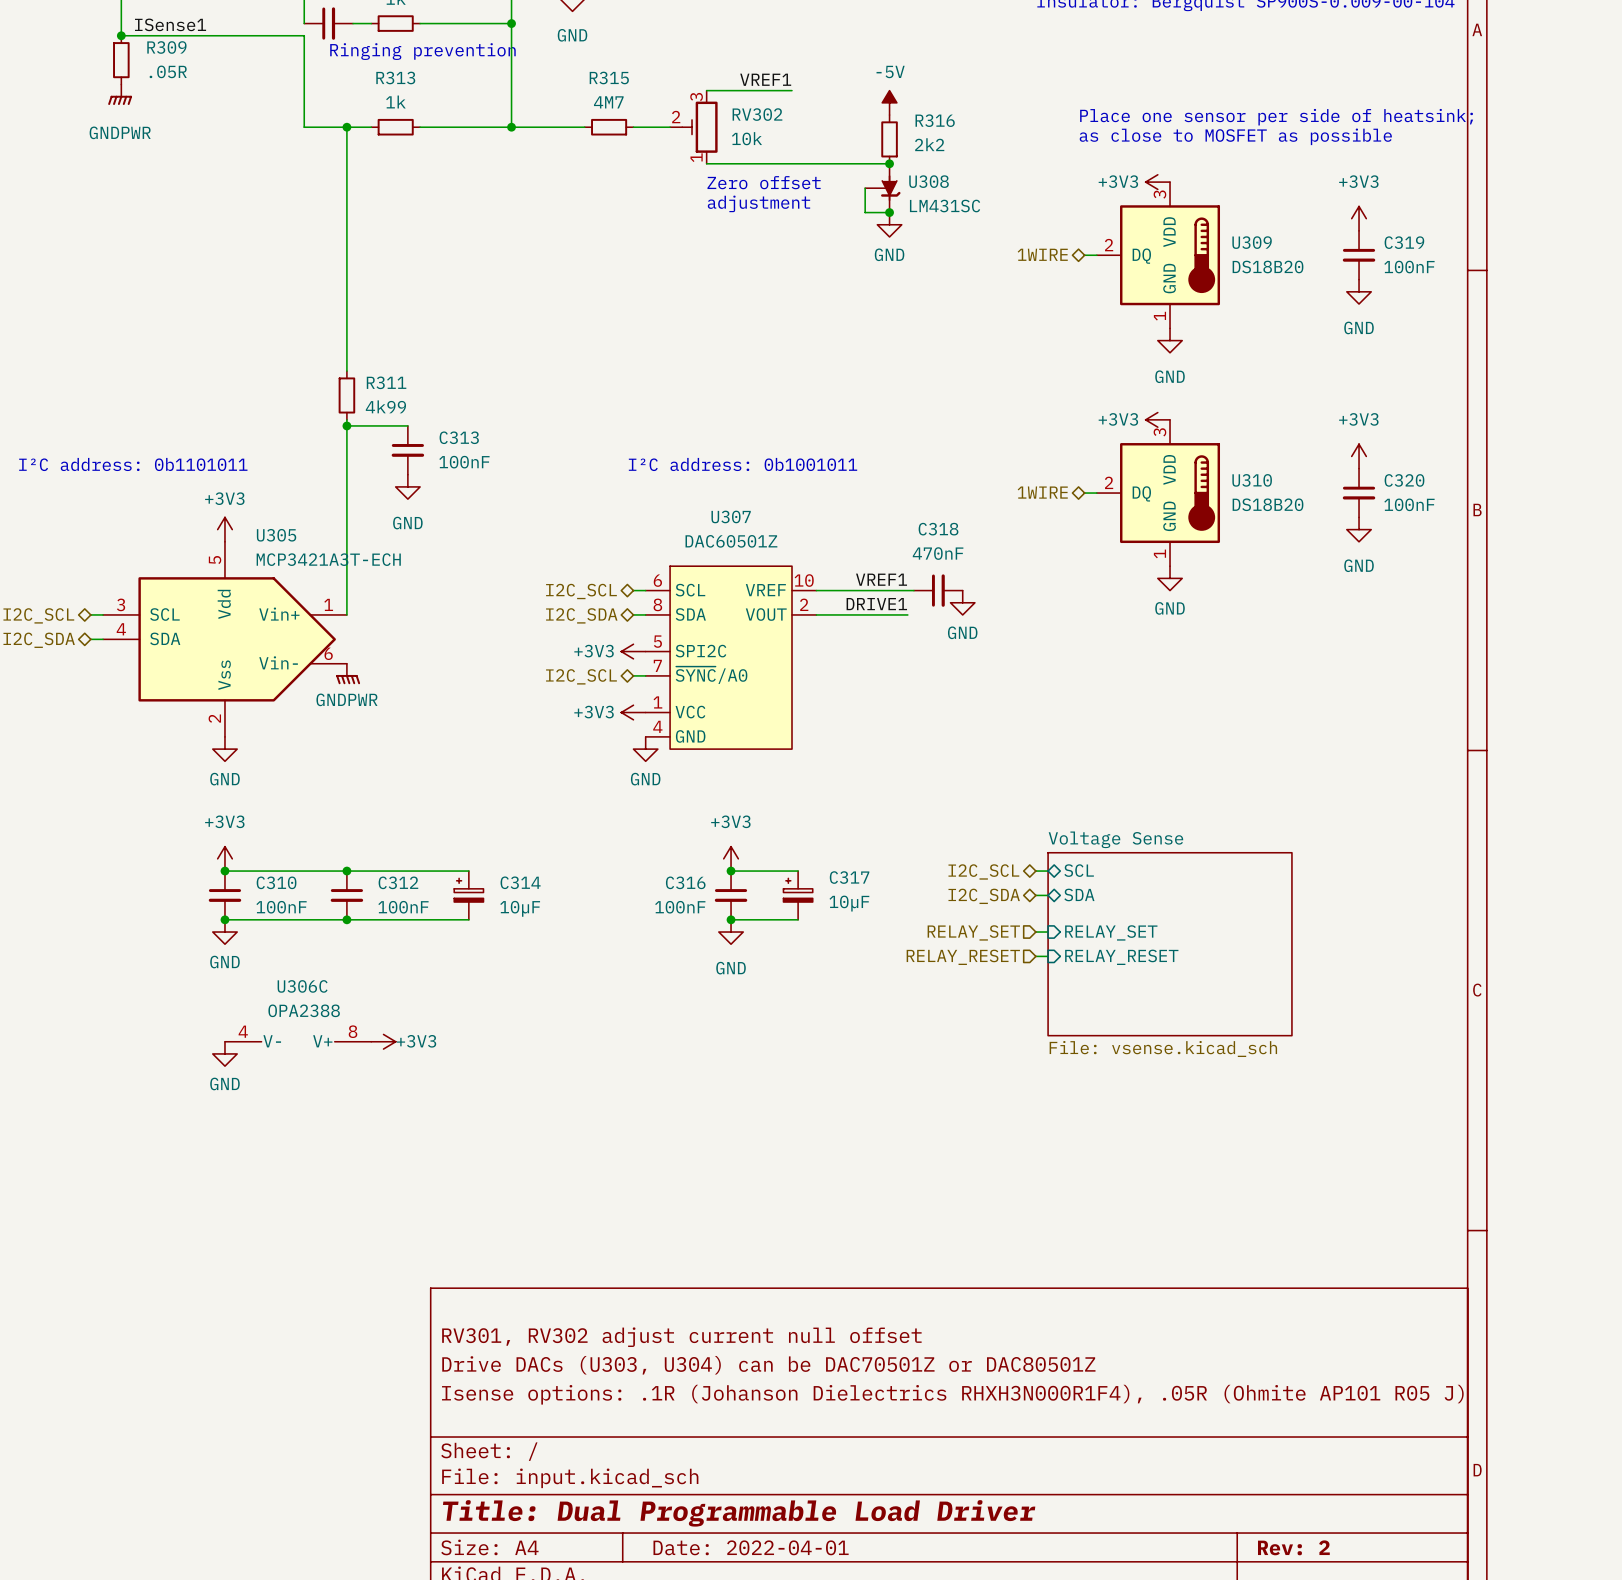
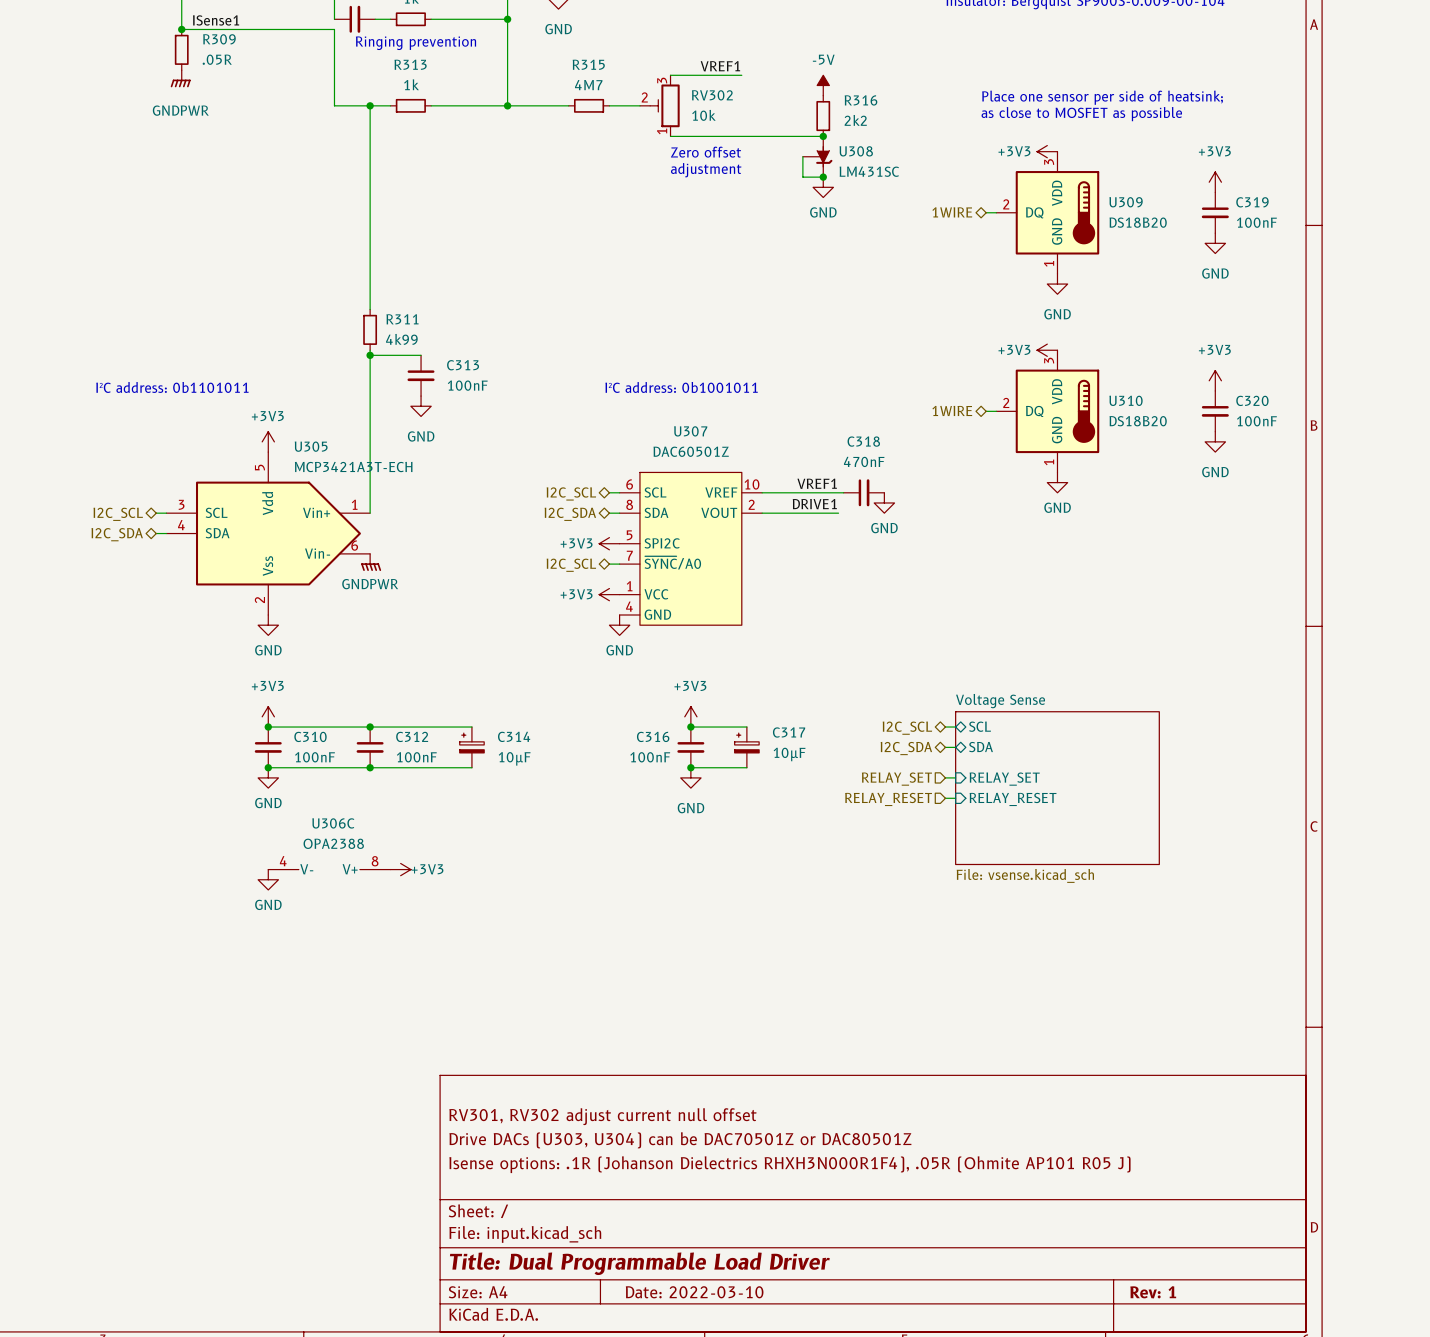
title block: Date: 2022-04-01 (751, 1547) -> Date: 2022-03-10 (694, 1292)
title block: Rev: 2 (1293, 1547) -> Rev: 1 (1153, 1292)

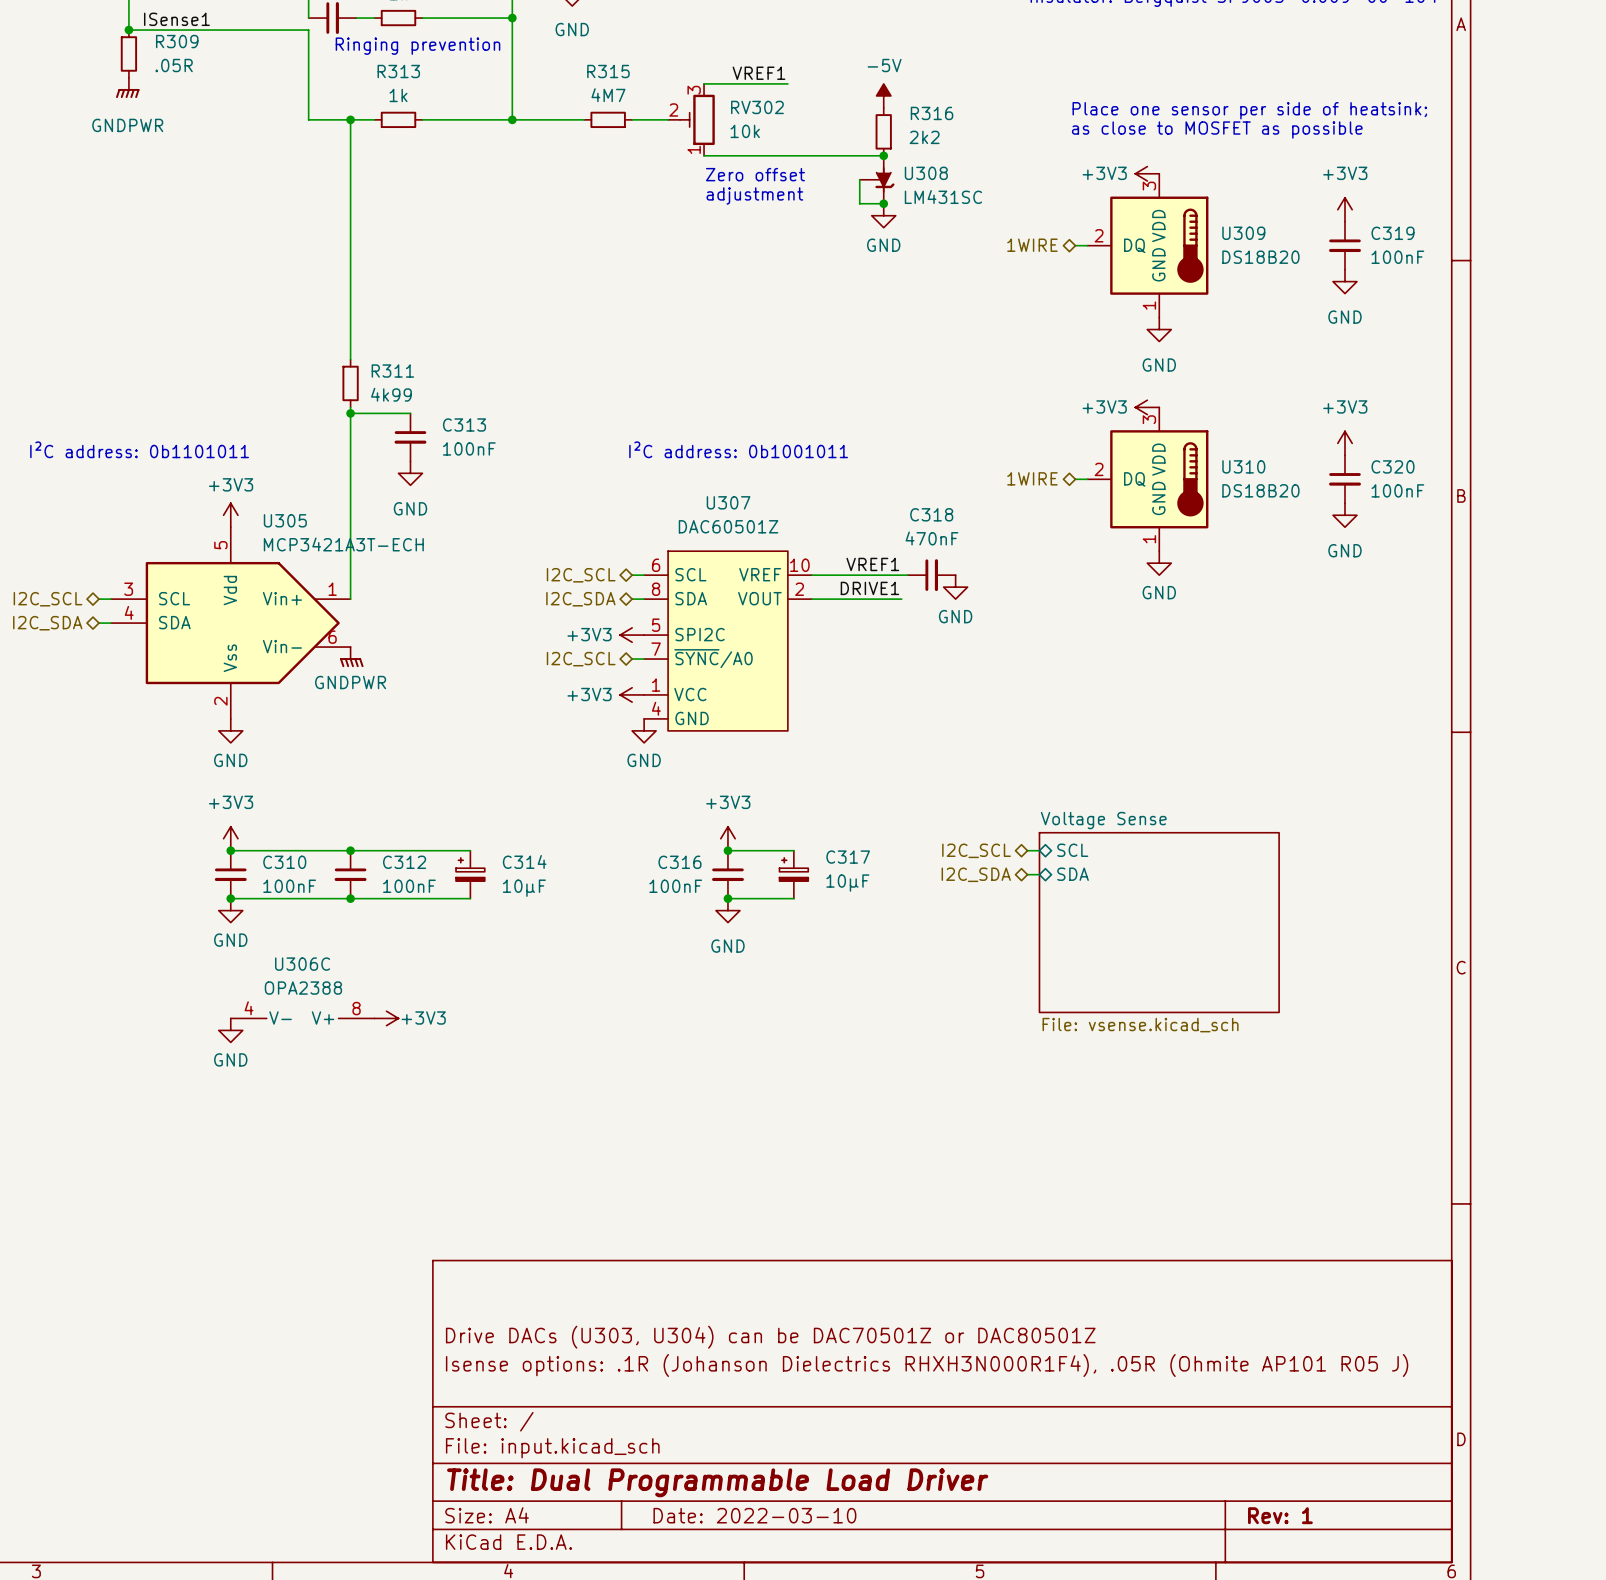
wire: (945, 777) (955, 777) -> none
hierarchical label: RELAY_SET (896, 779) -> none
sheet pin: RELAY_SET (1004, 779) -> none
wire: (945, 798) (955, 798) -> none
hierarchical label: RELAY_RESET (888, 799) -> none
sheet pin: RELAY_RESET (1013, 799) -> none
title block: RV301, RV302 adjust current null offset (602, 1116) -> none

